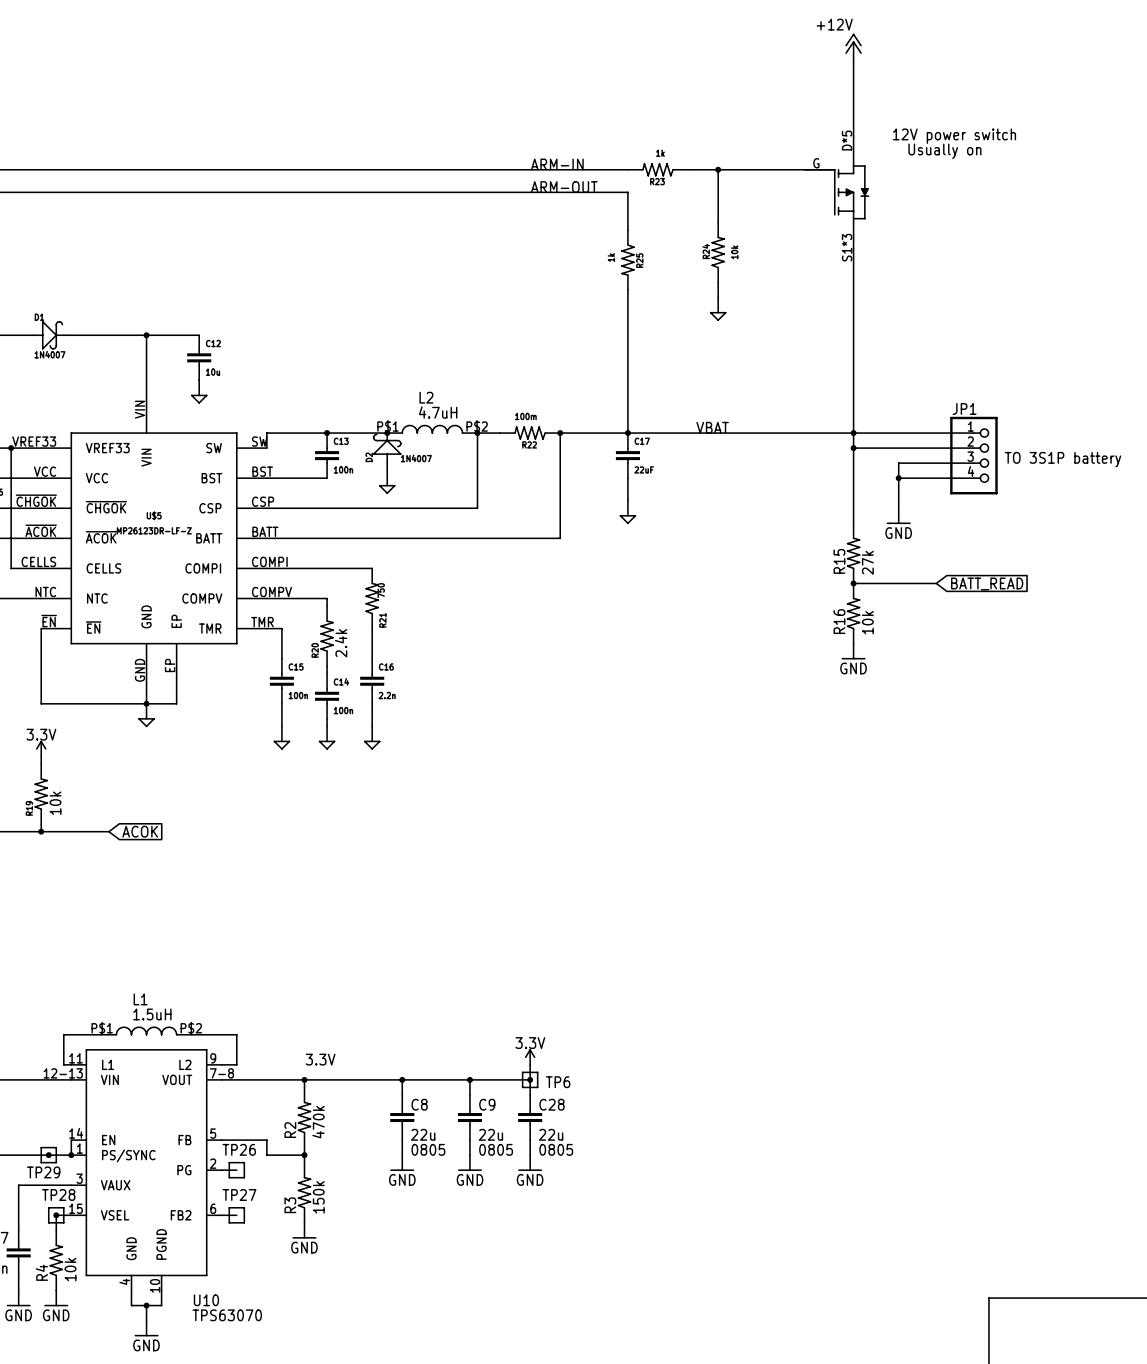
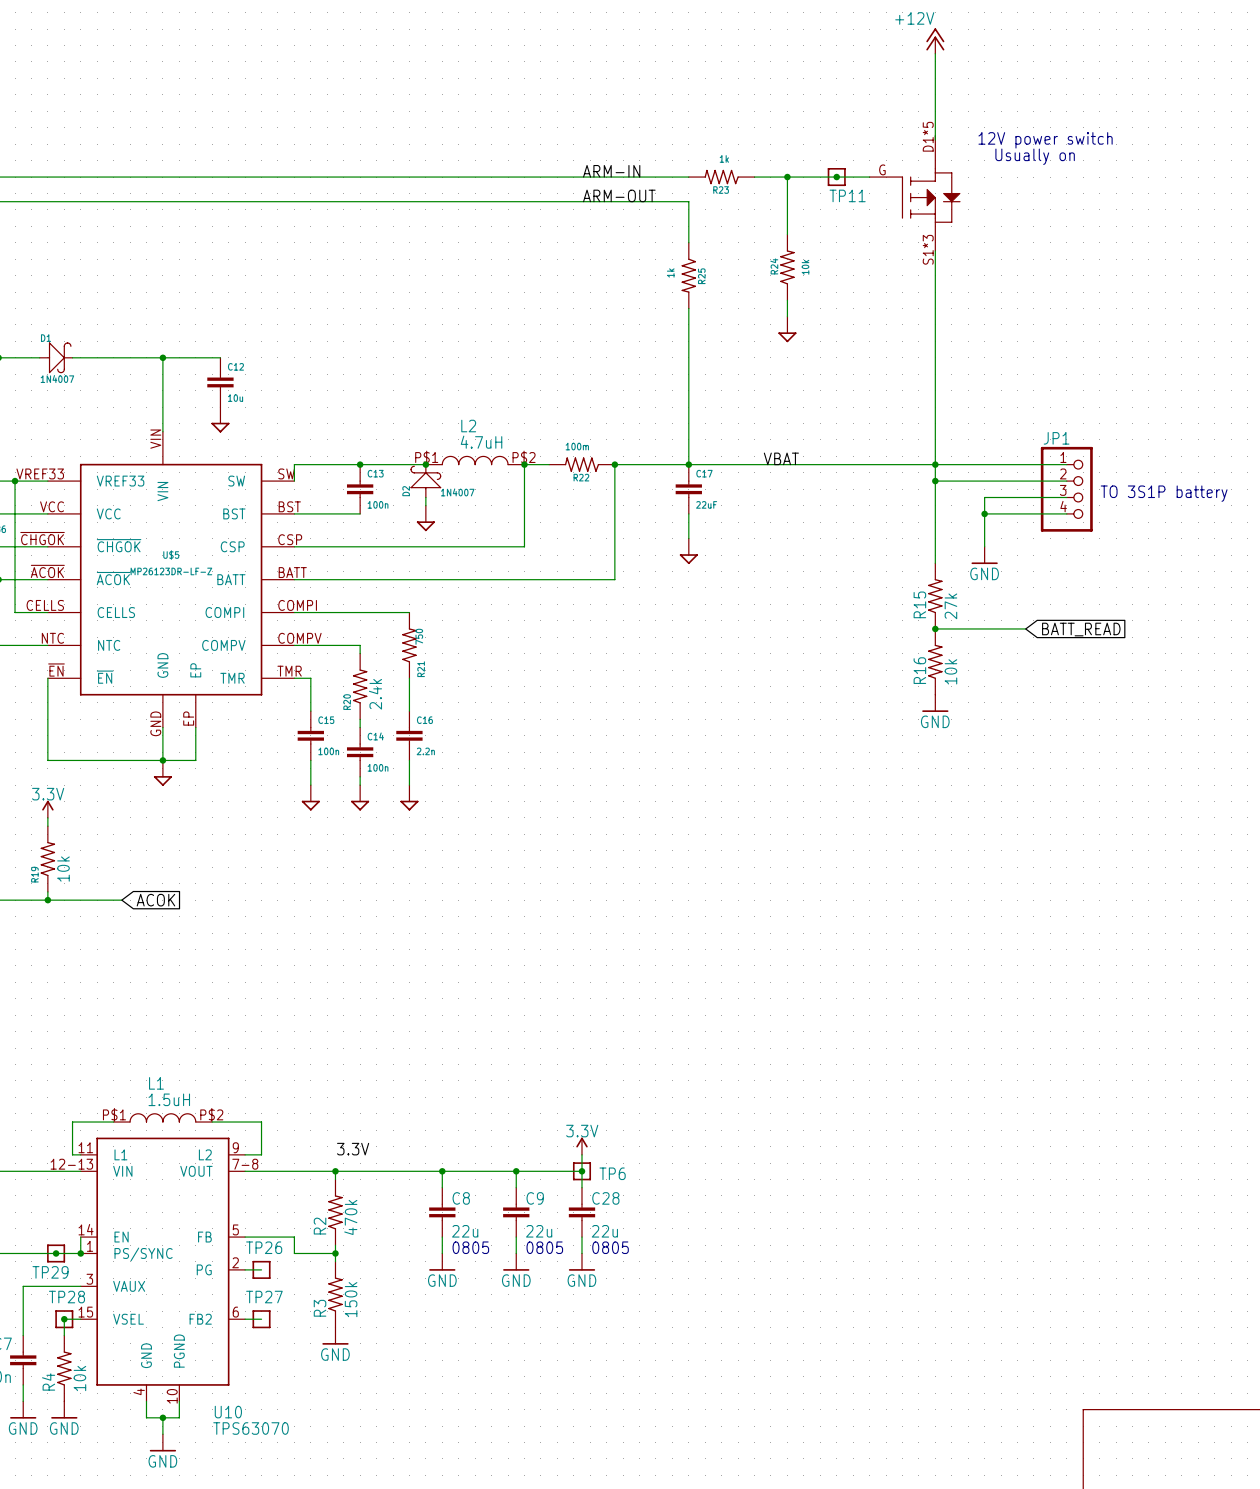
TP11: none -> (836, 177)
junction: none -> (836, 177)
part: none -> (915, 193)
part: (836, 192) -> none

